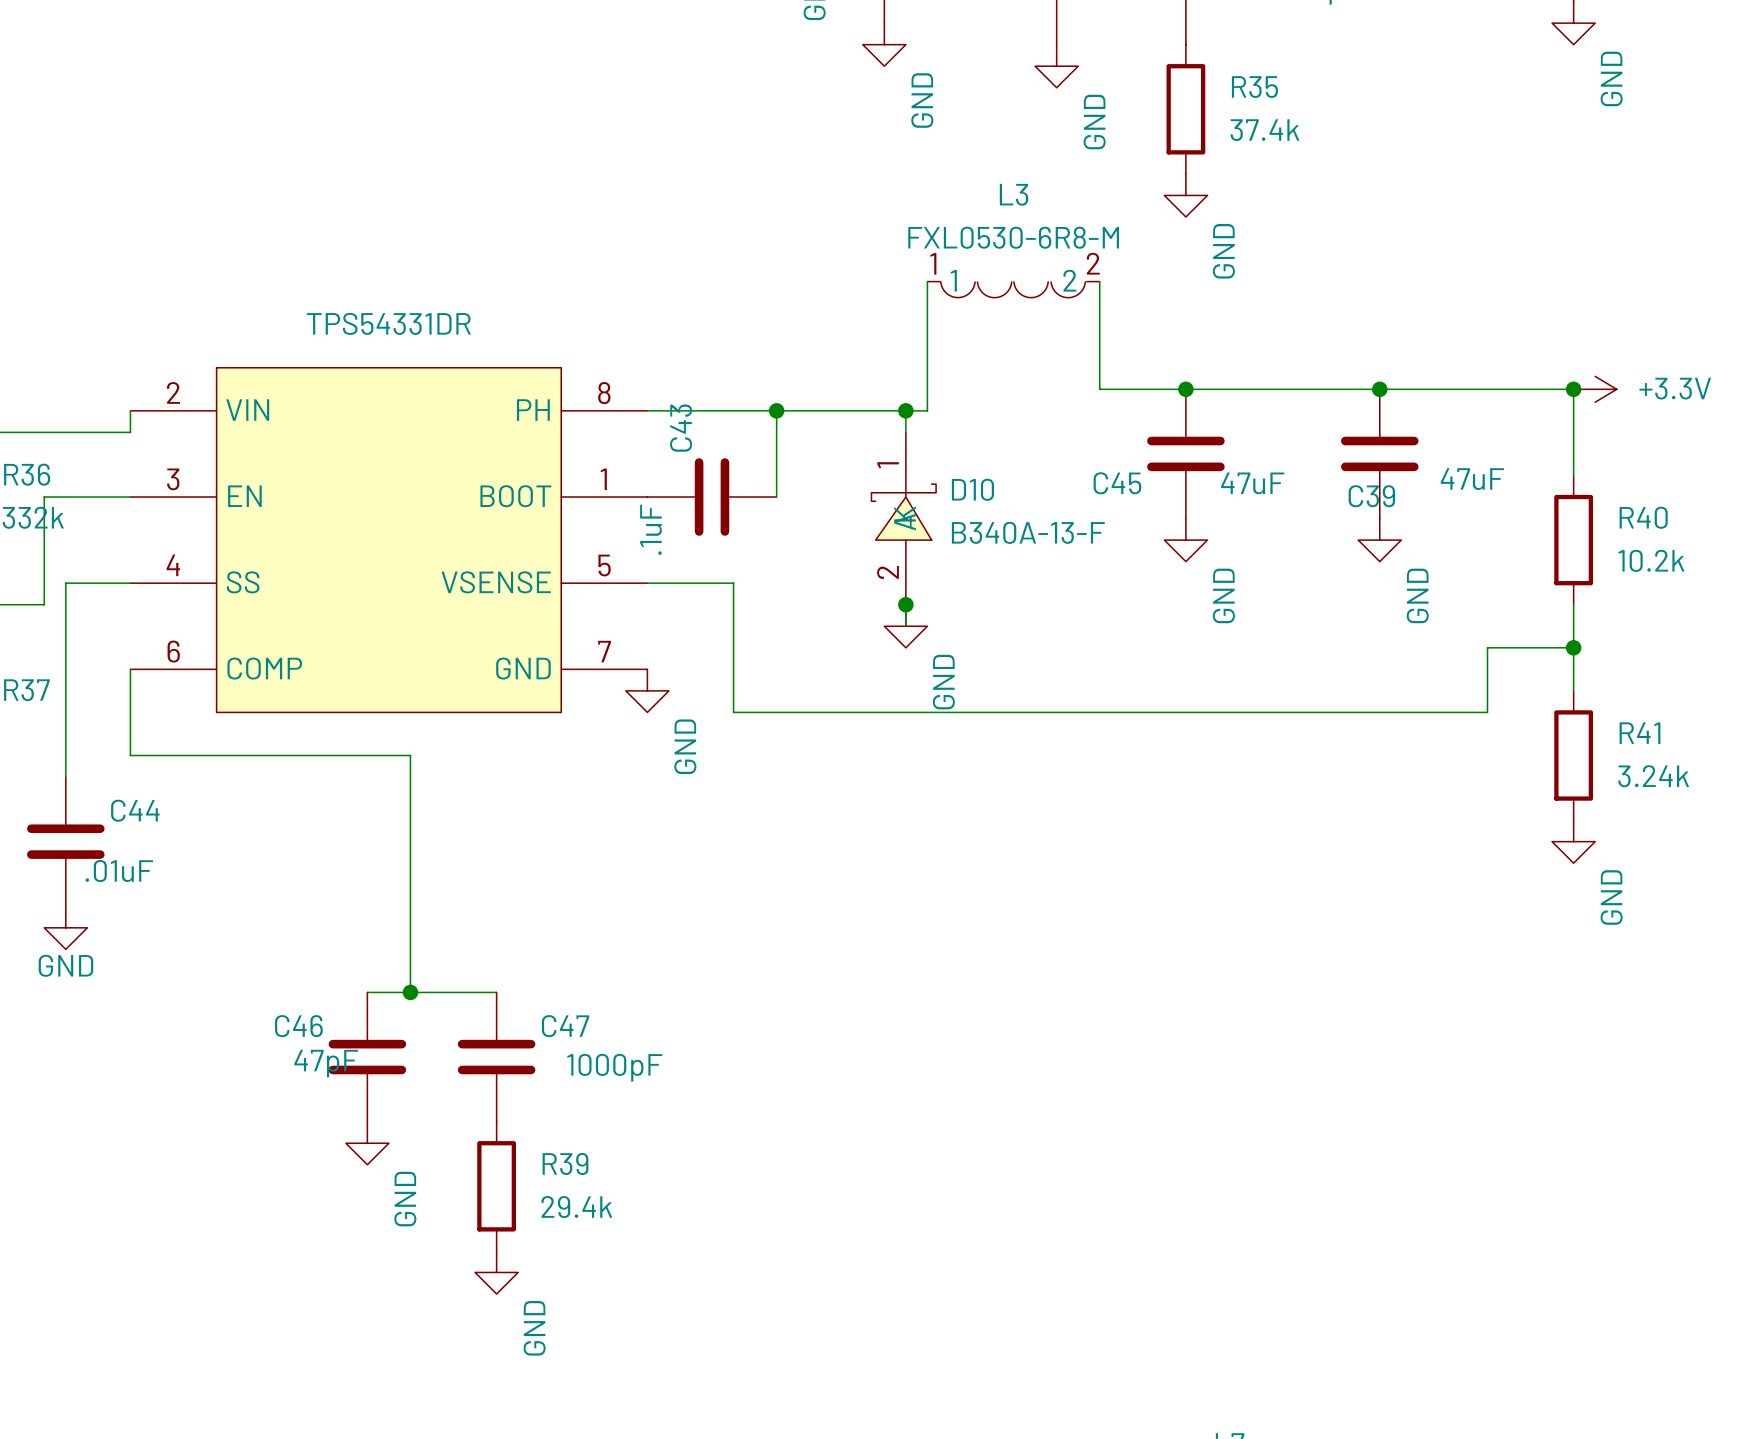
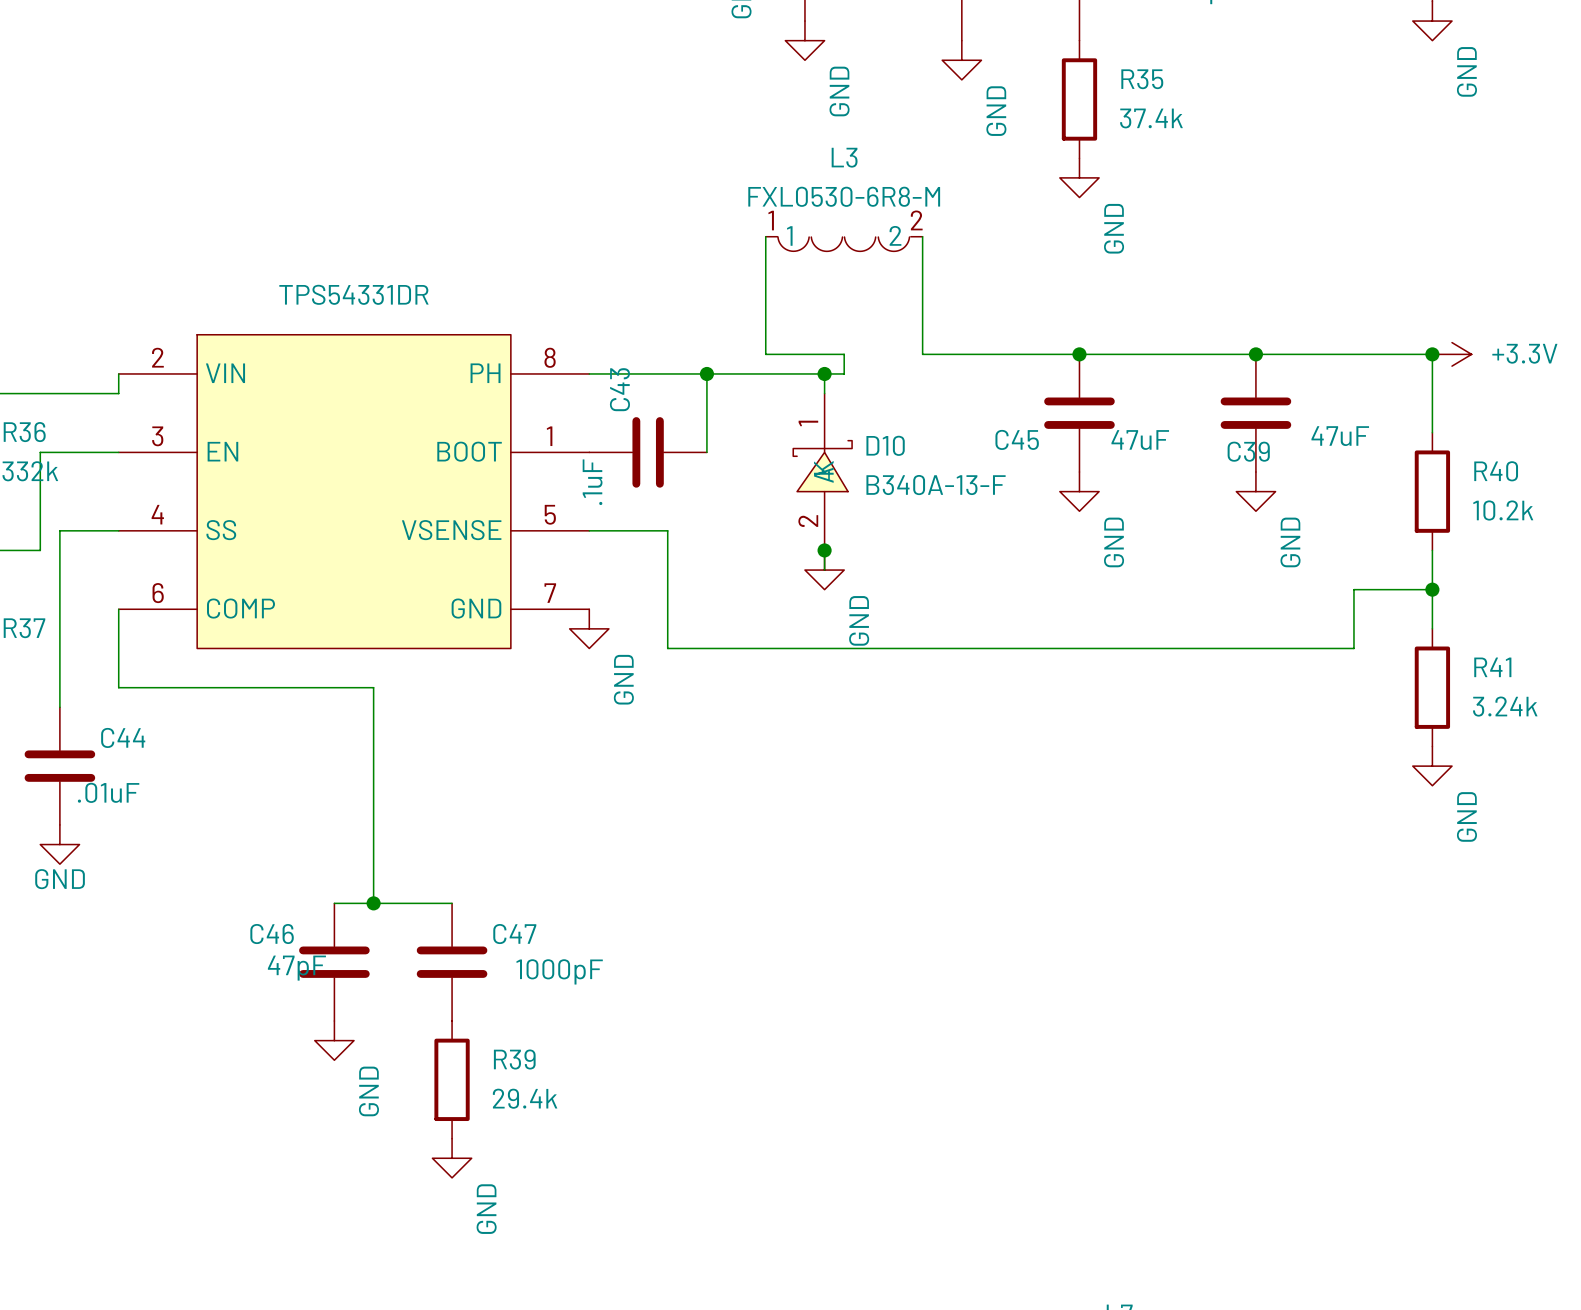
wire: (927, 281) (927, 389) -> (765, 236) (765, 354) (844, 354)
wire: (1099, 281) (1099, 389) -> (922, 236) (922, 354) (1001, 354)
L3 position: (1013, 289) -> (844, 244)

